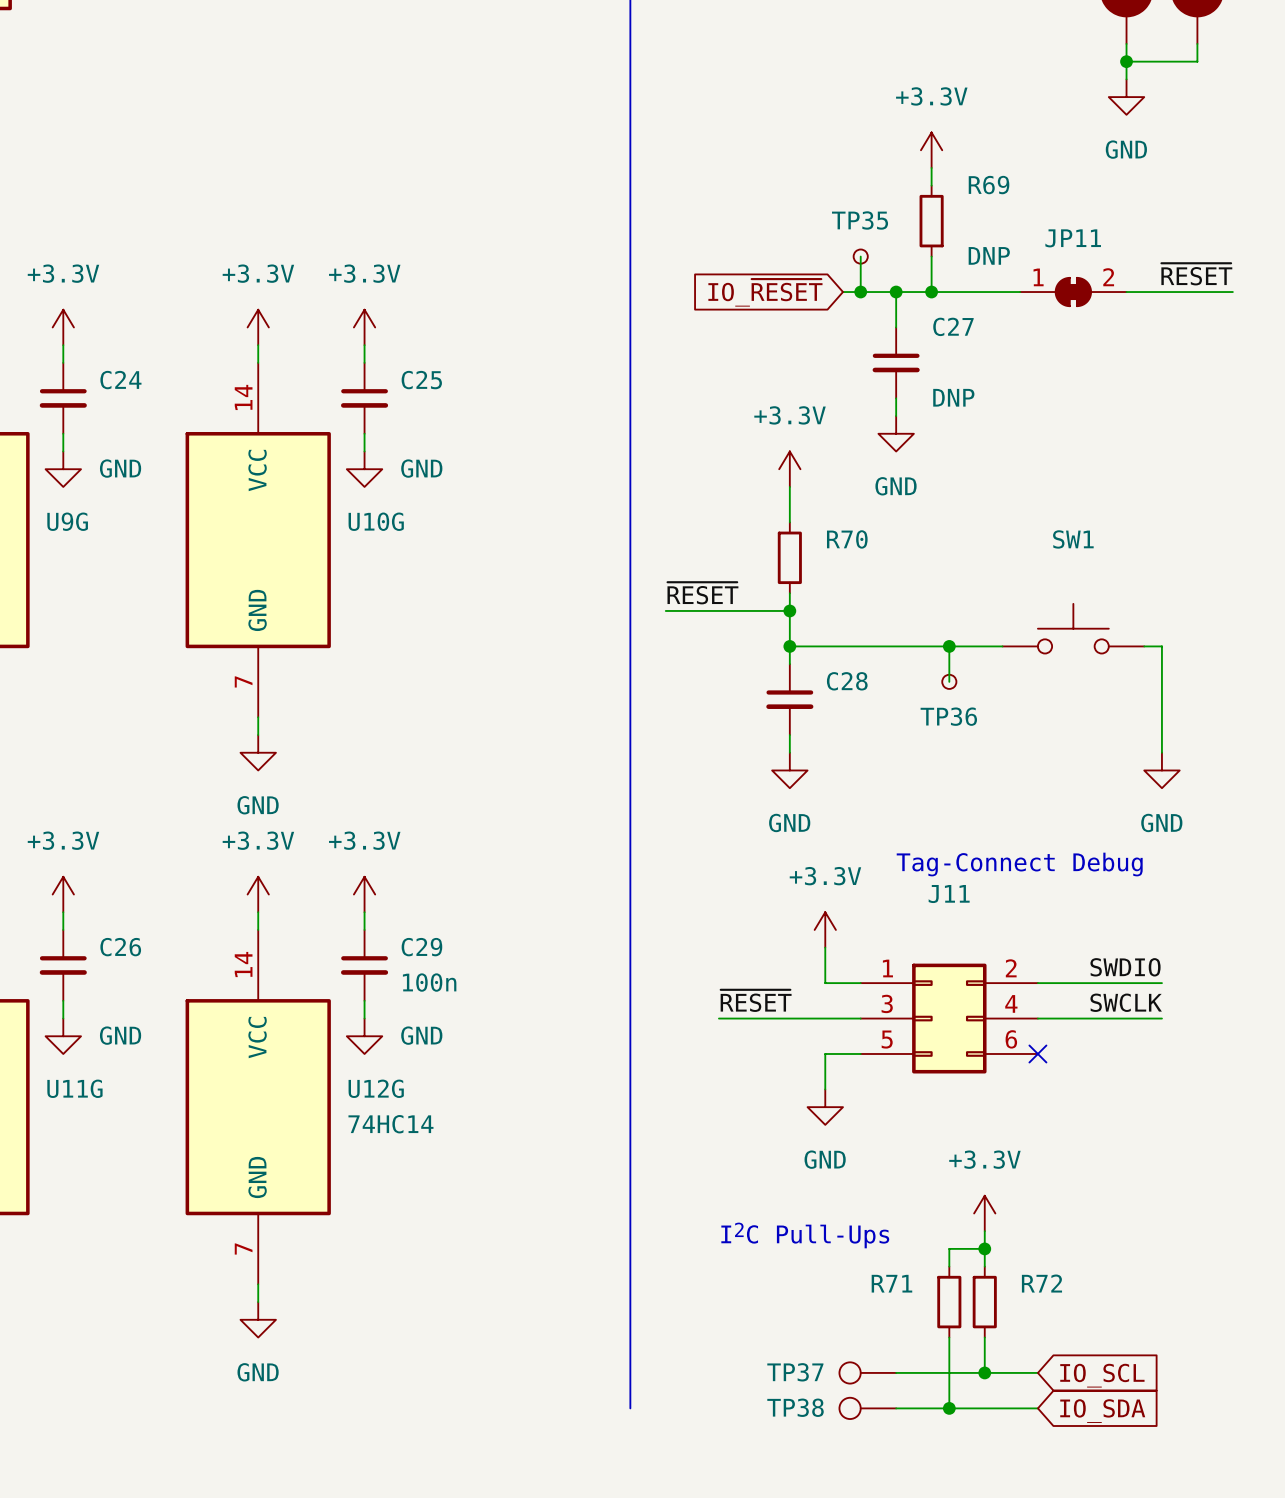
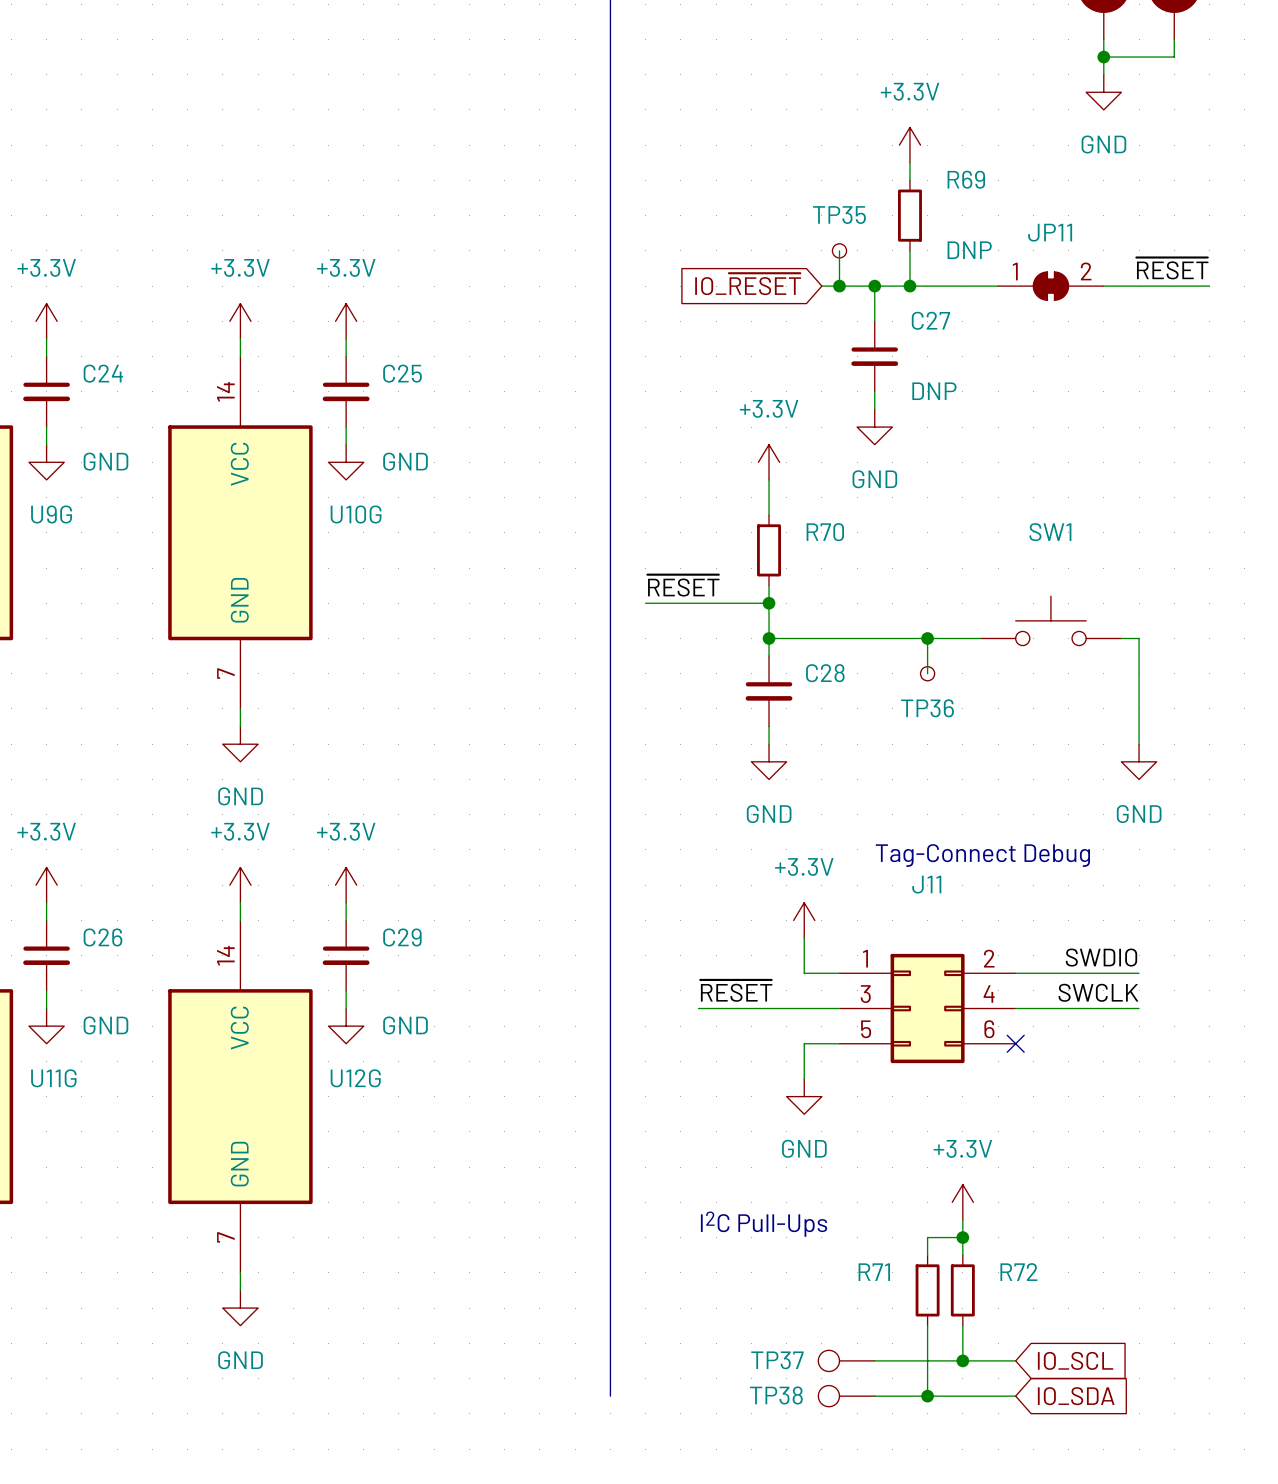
C29 value: 100n (429, 982) -> none
U12G value: 74HC14 (390, 1124) -> none

